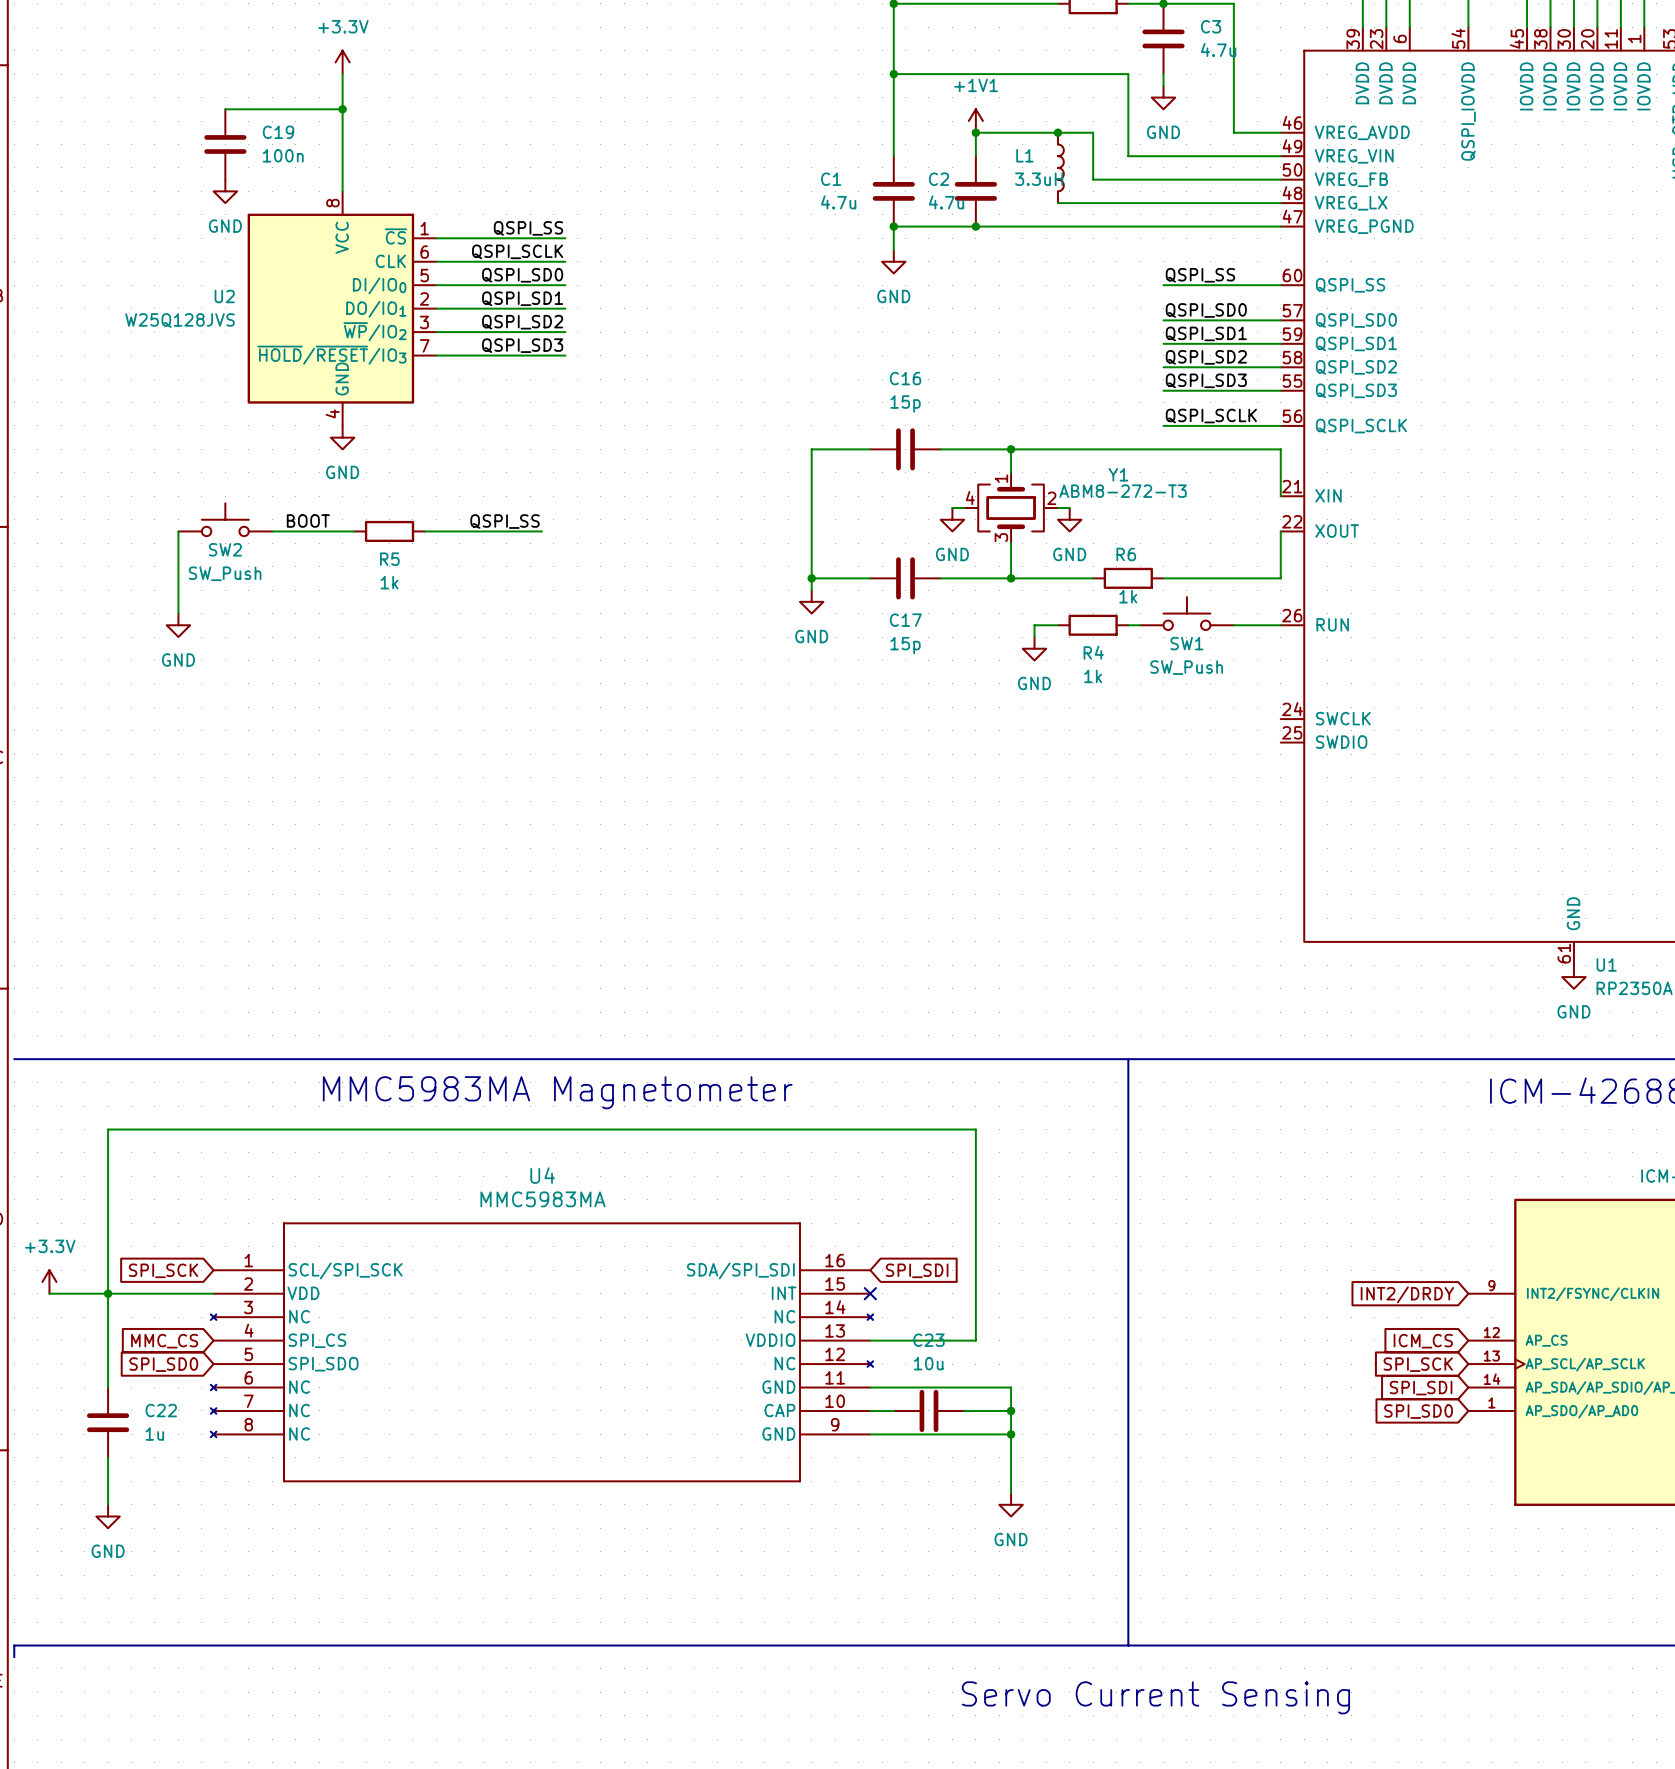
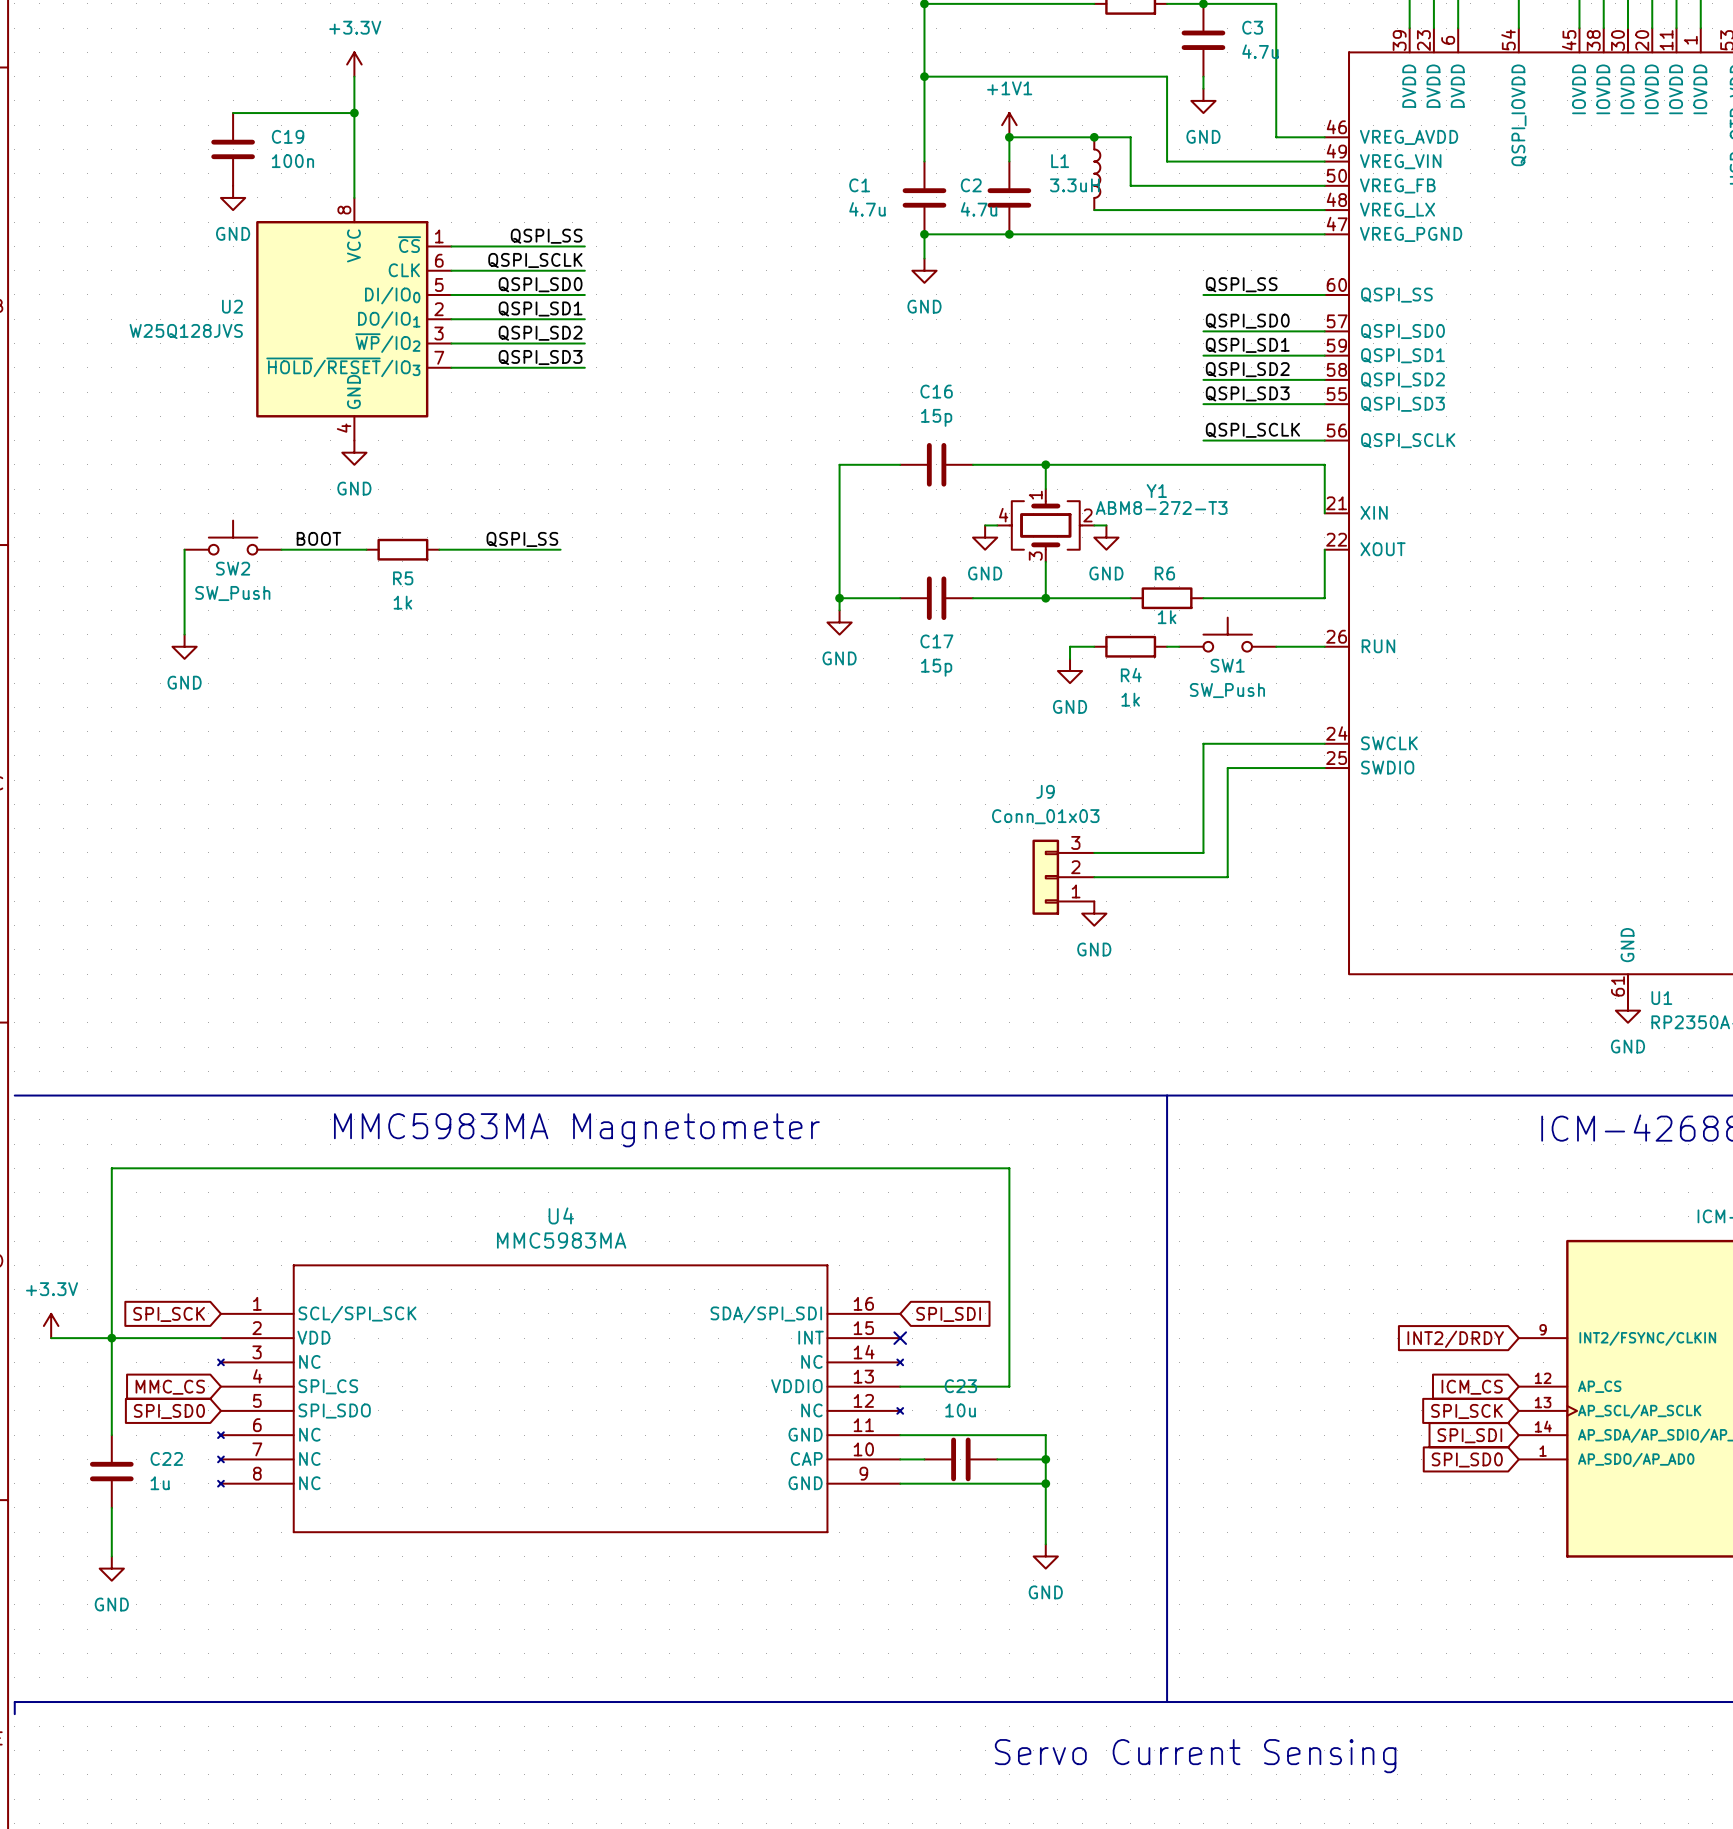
wire: none -> (1324, 743) (1203, 743) (1203, 852) (1094, 852)
wire: none -> (1324, 768) (1227, 768) (1227, 877) (1094, 877)
J9: none -> Conn_01x03 (1063, 877)
power symbol: none -> GND (1094, 913)

